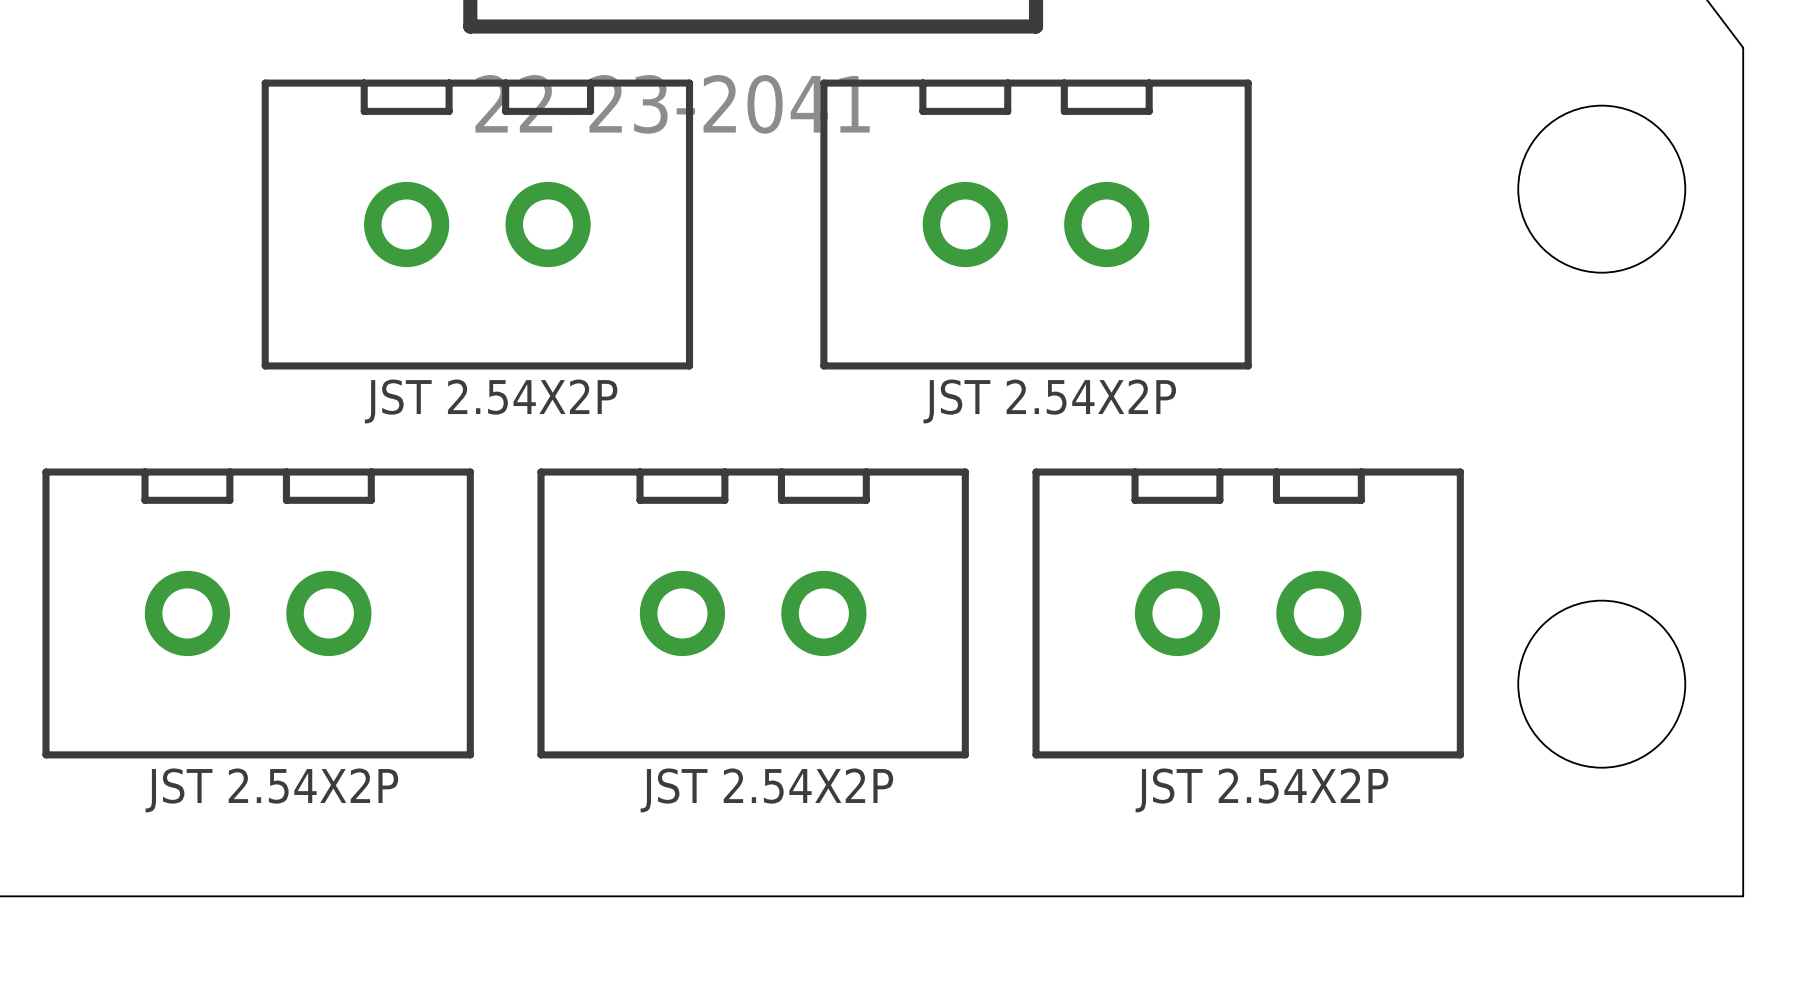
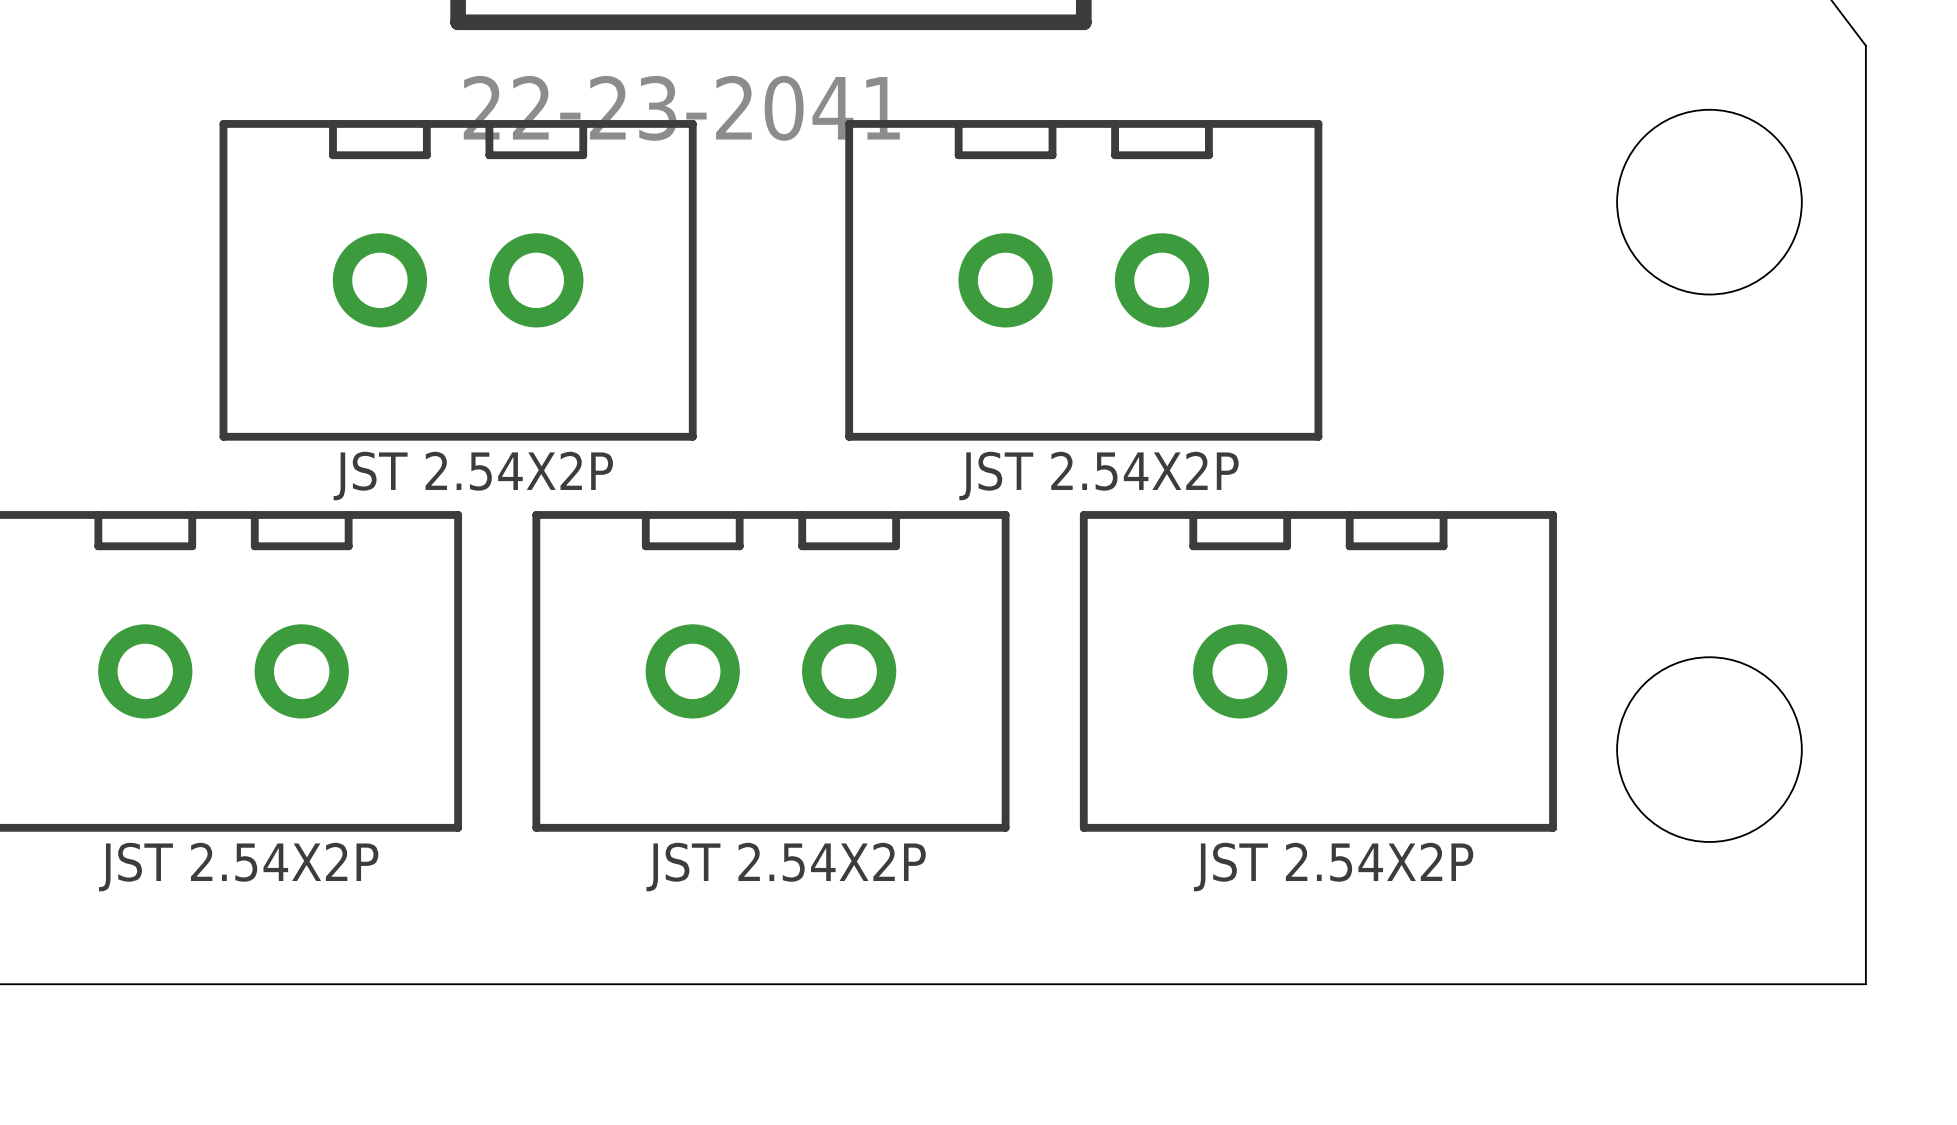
part position: (477, 224) -> (458, 280)
part position: (1036, 224) -> (1083, 280)

